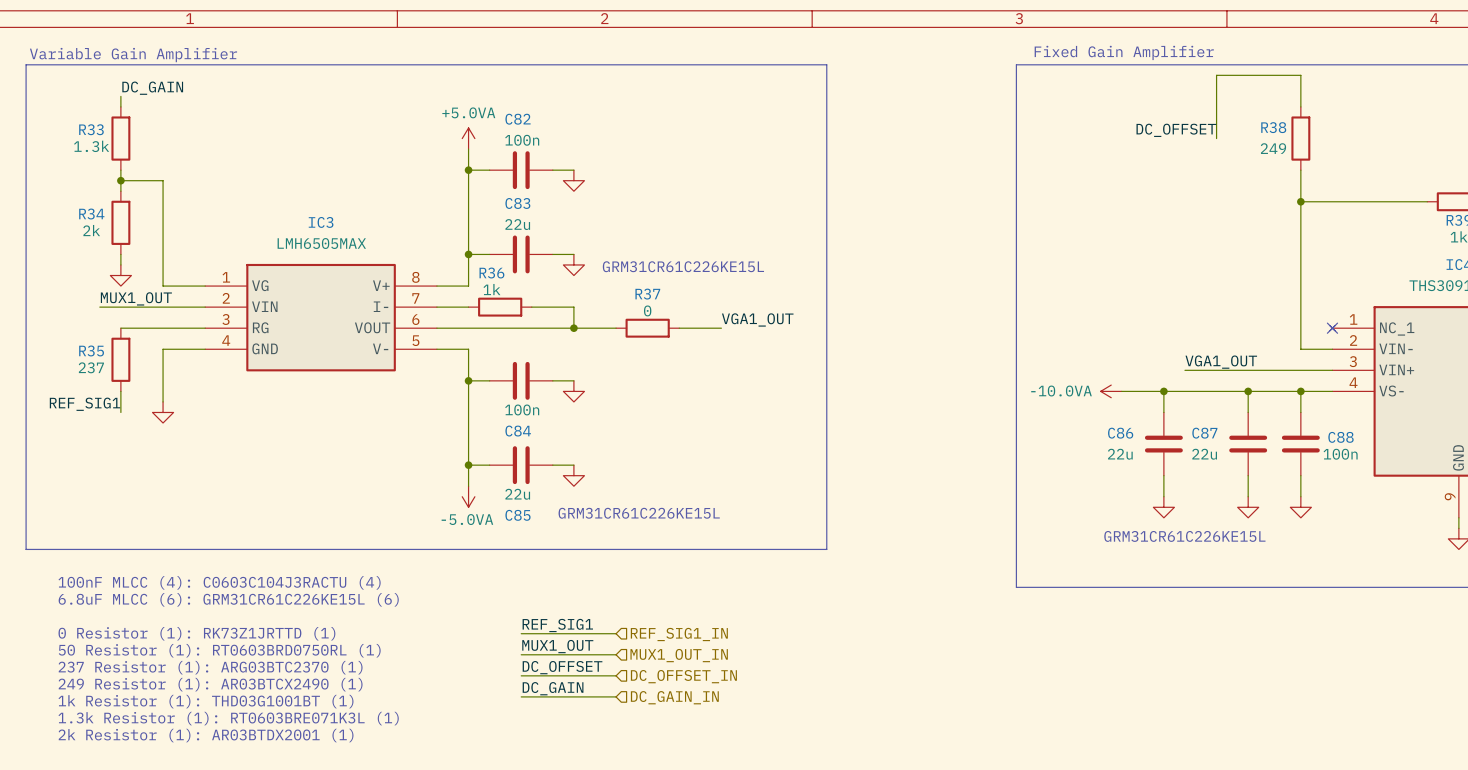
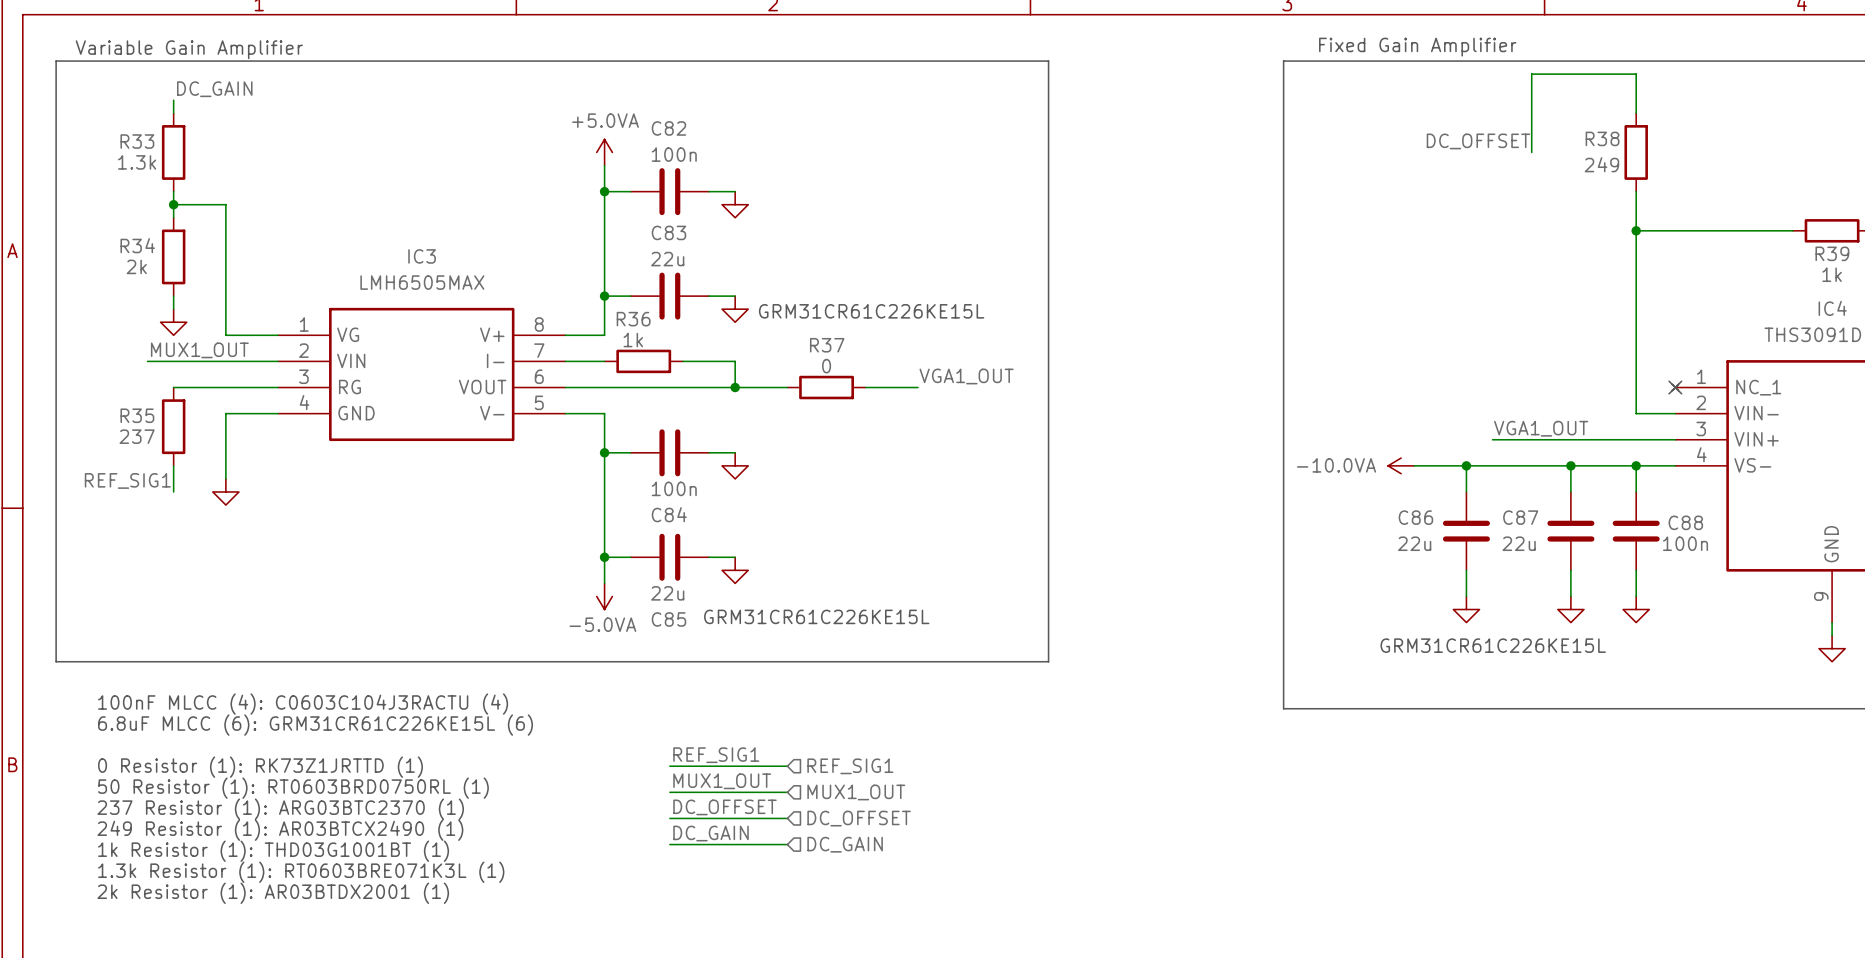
hierarchical label: REF_SIG1_IN (679, 634) -> REF_SIG1 (850, 766)
hierarchical label: MUX1_OUT_IN (679, 655) -> MUX1_OUT (856, 792)
hierarchical label: DC_OFFSET_IN (683, 676) -> DC_OFFSET (859, 818)
hierarchical label: DC_GAIN_IN (674, 697) -> DC_GAIN (845, 844)

